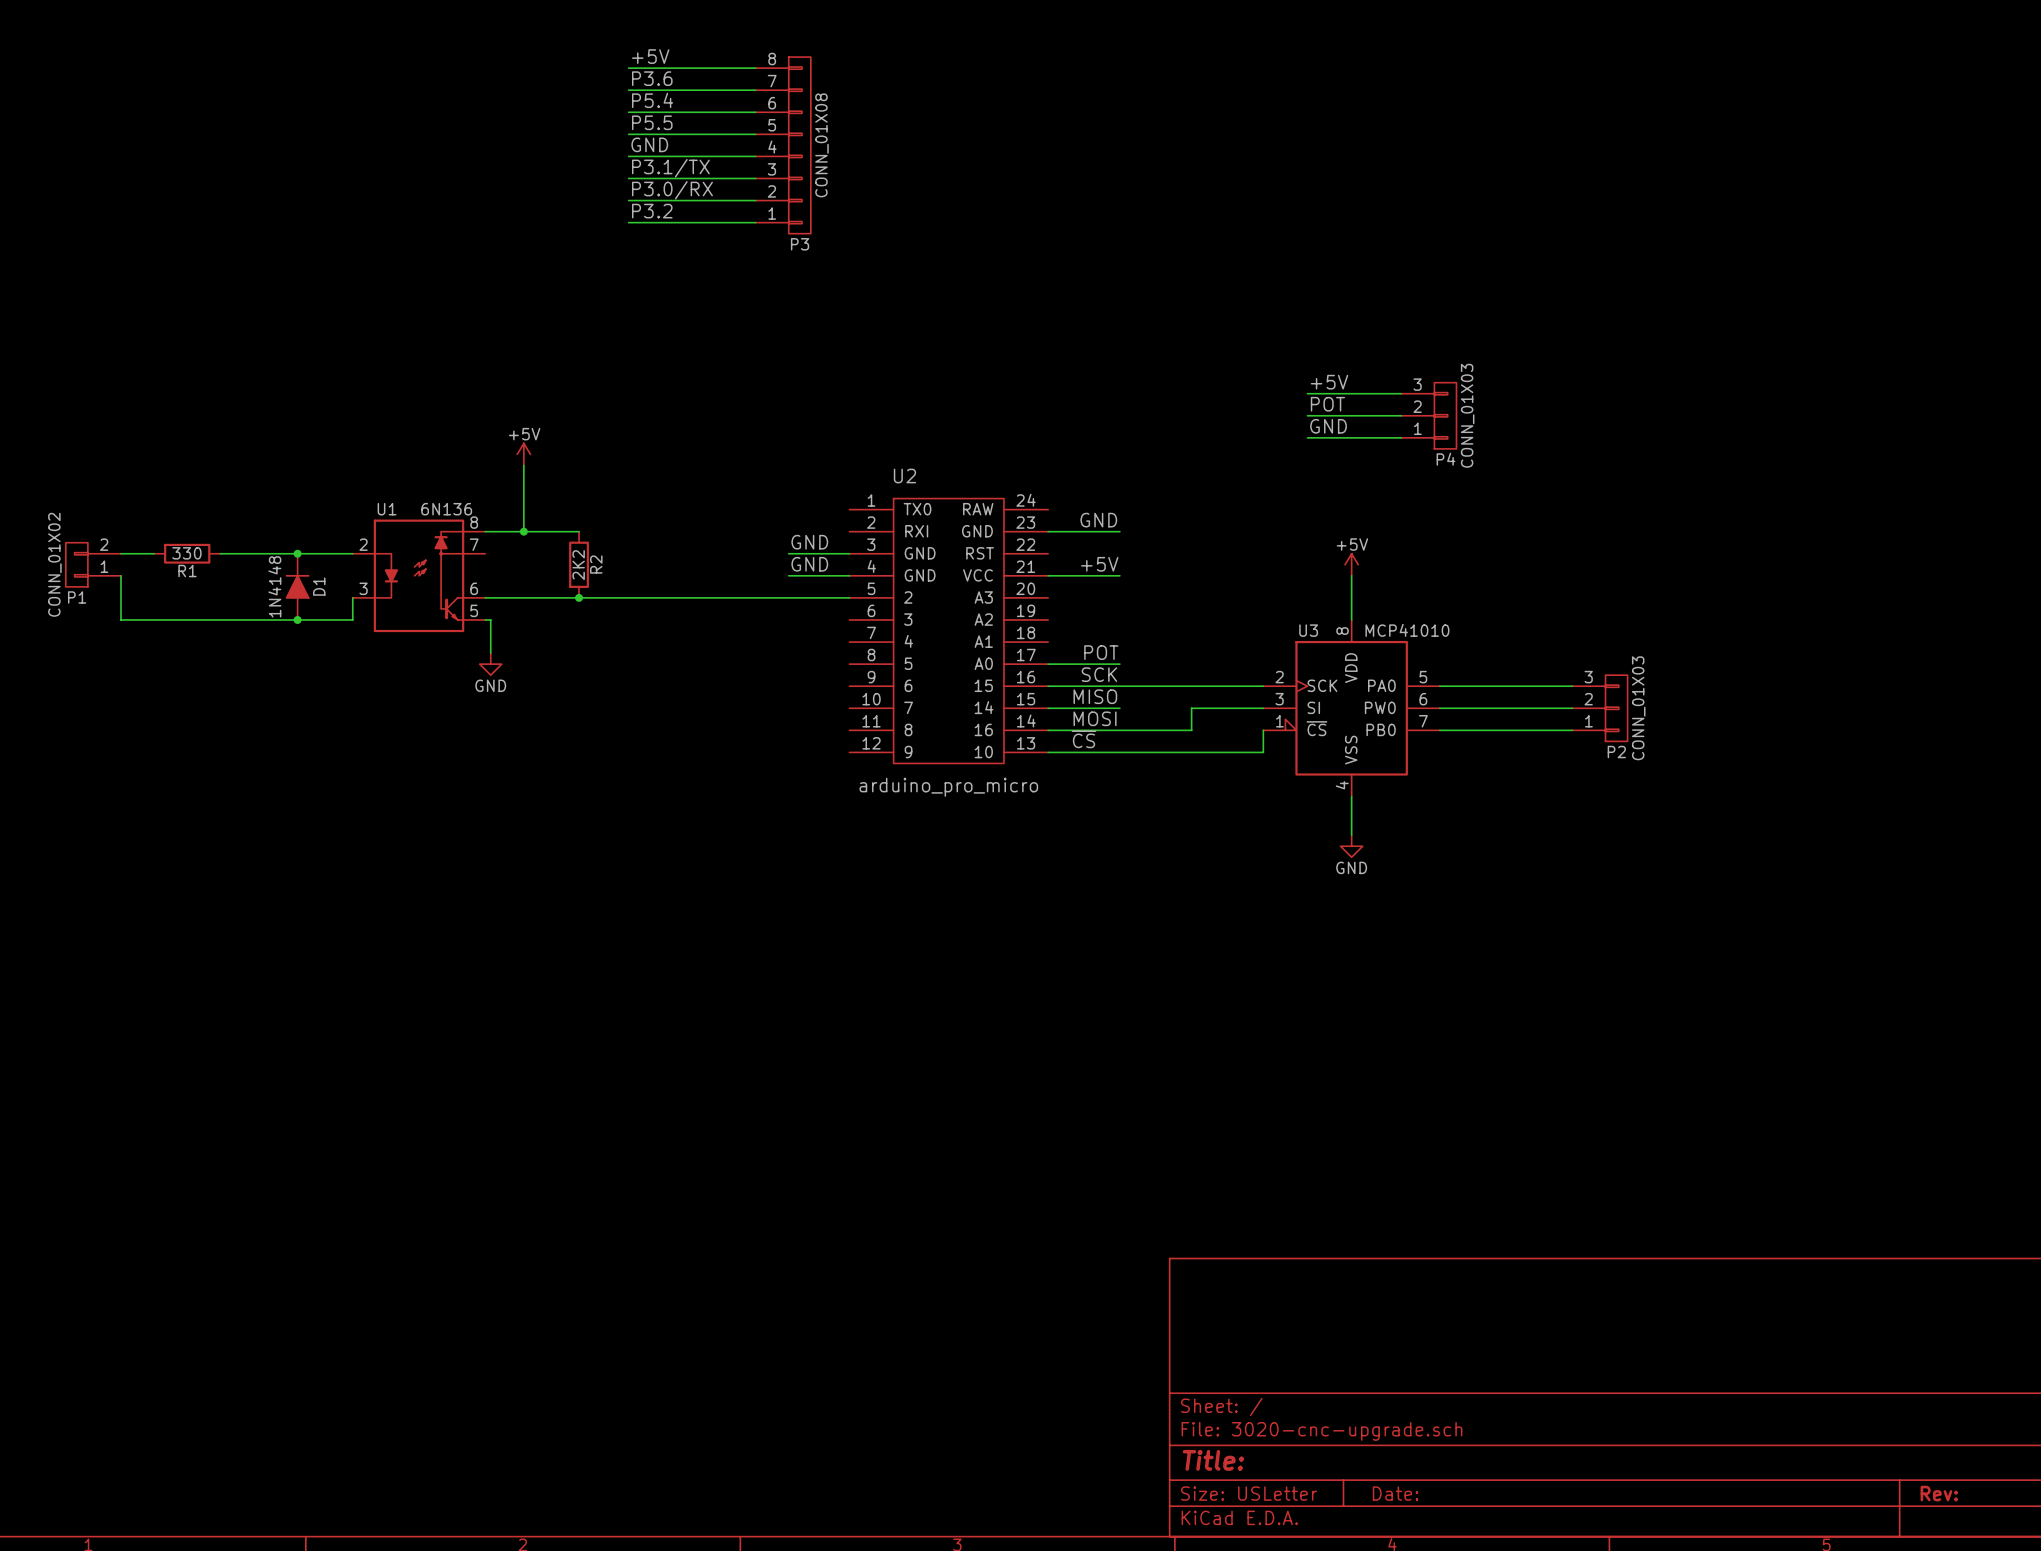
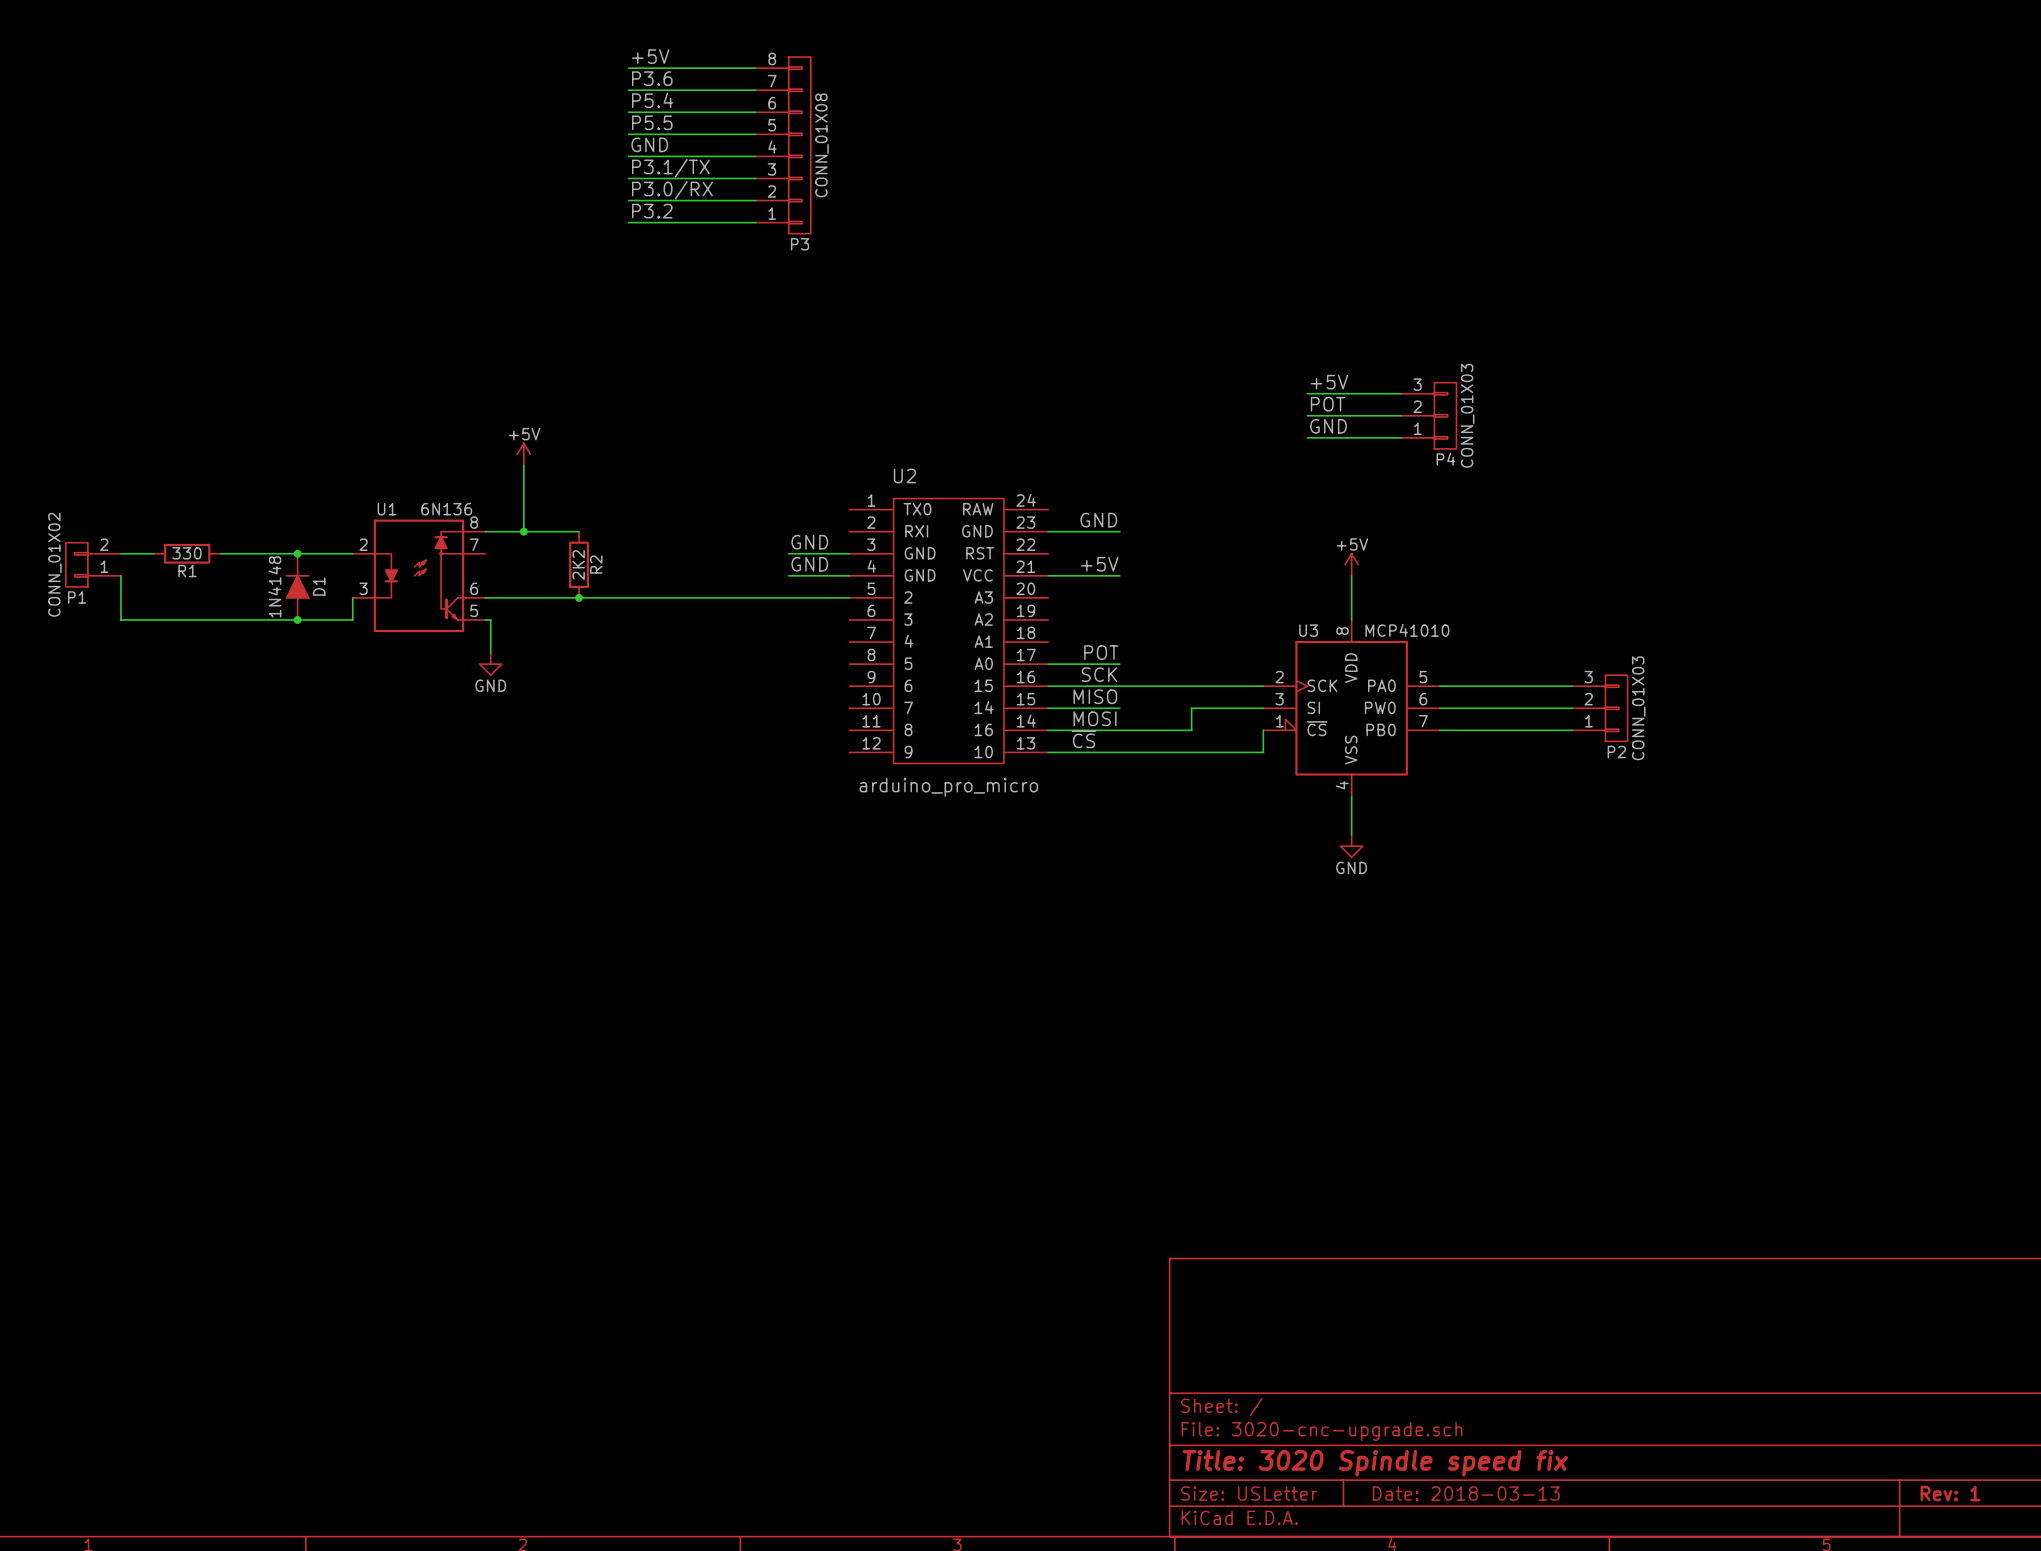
title block: Title: (1213, 1460) -> Title: 3020 Spindle speed fix (1375, 1463)
title block: Date: (1395, 1493) -> Date: 2018-03-13 (1466, 1493)
title block: Rev: (1939, 1493) -> Rev: 1 (1950, 1493)

